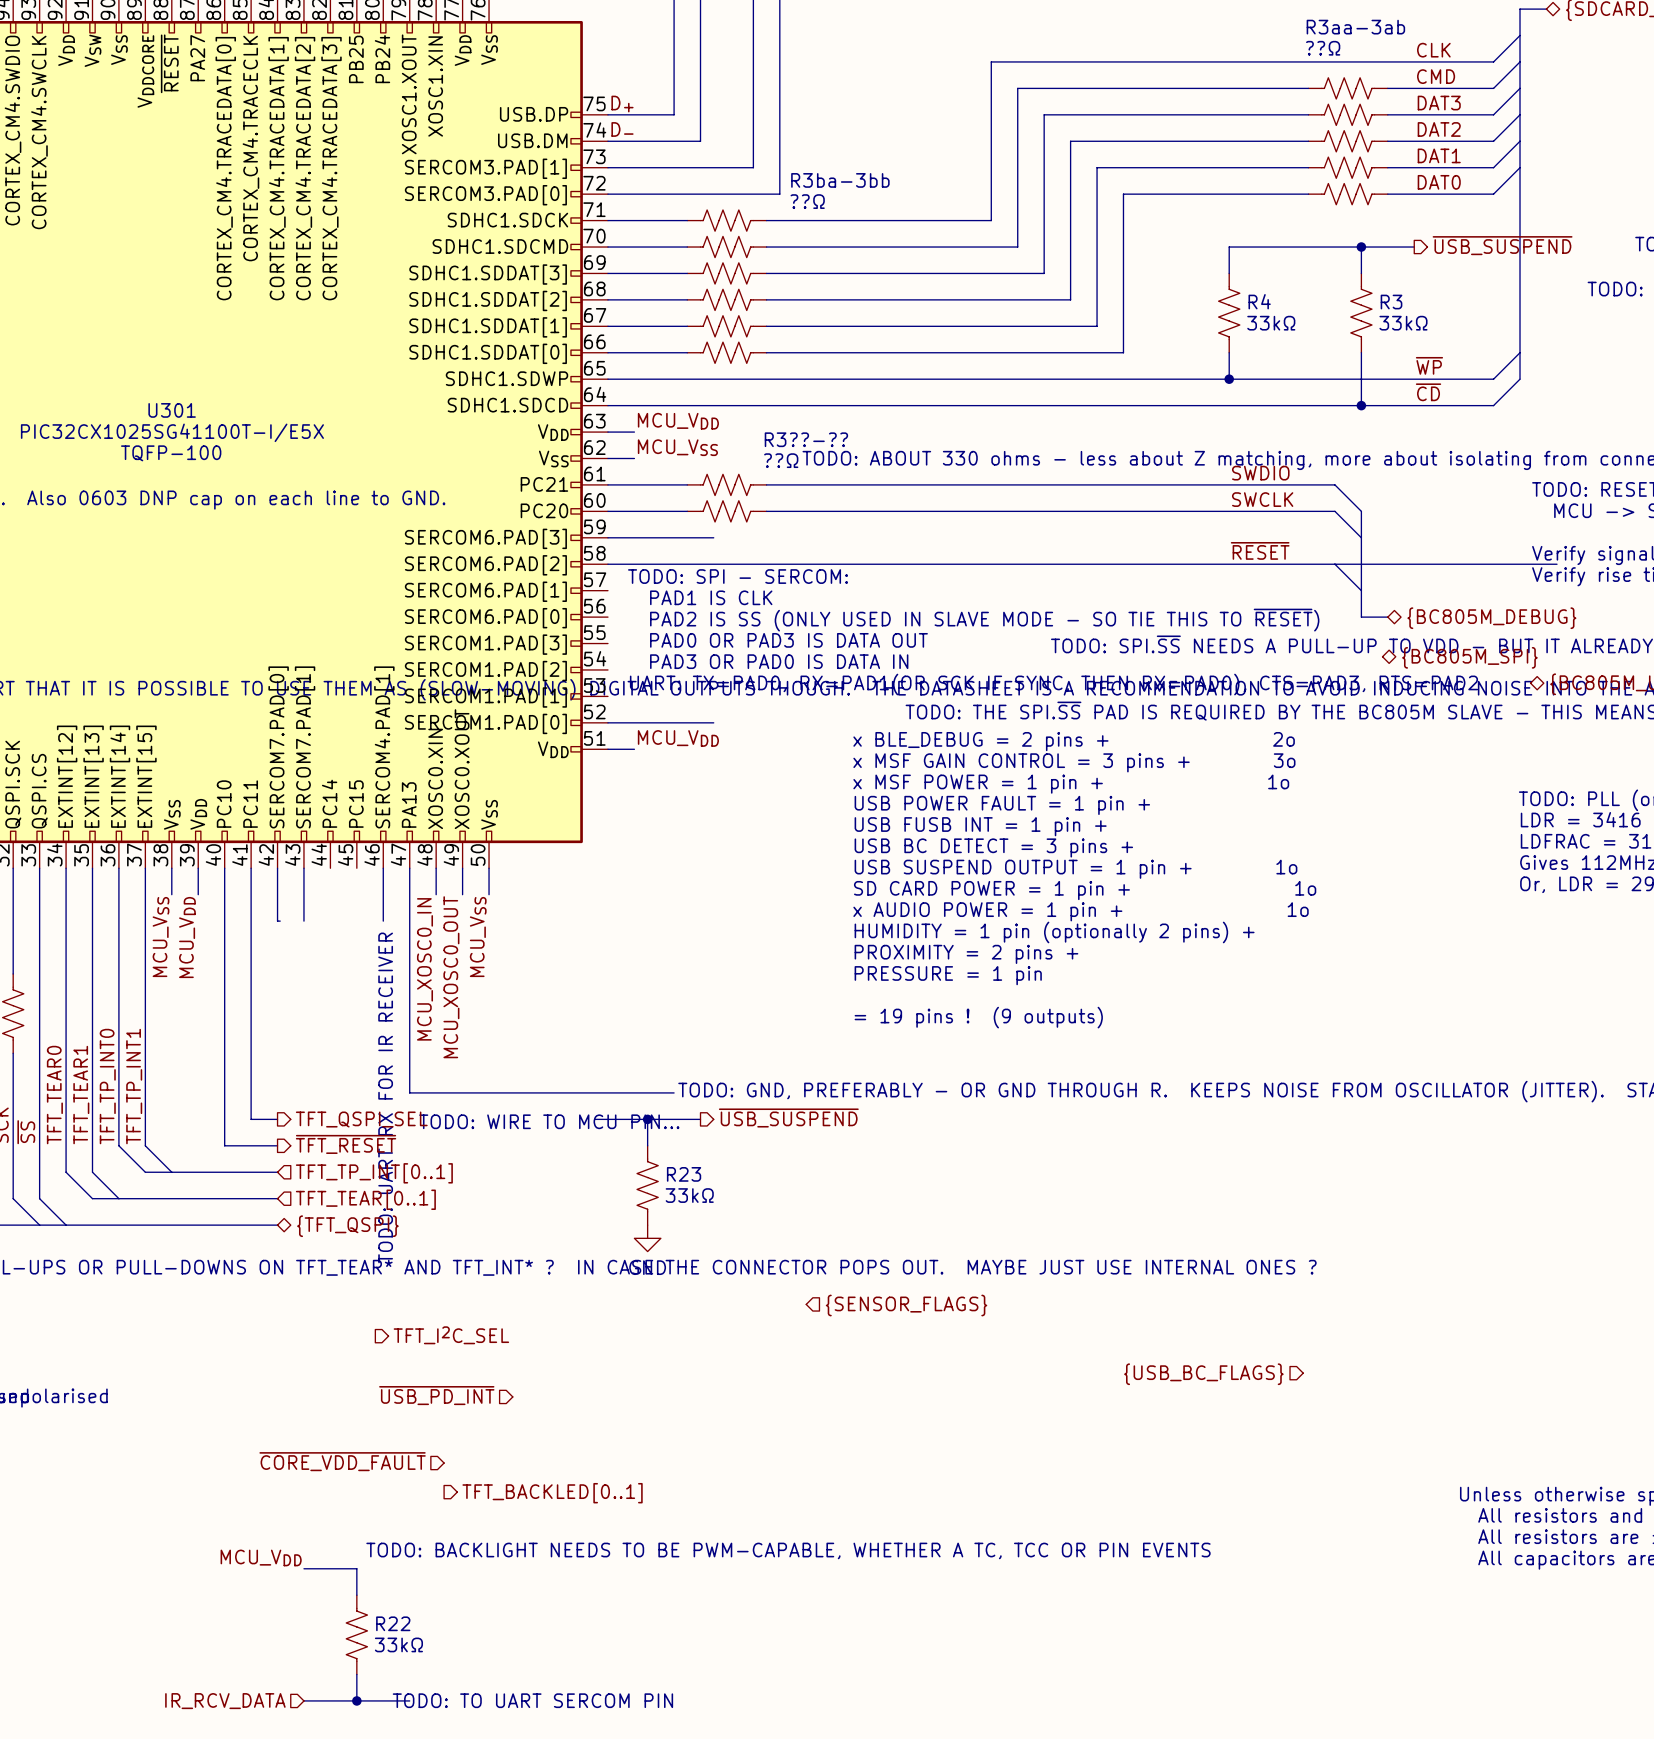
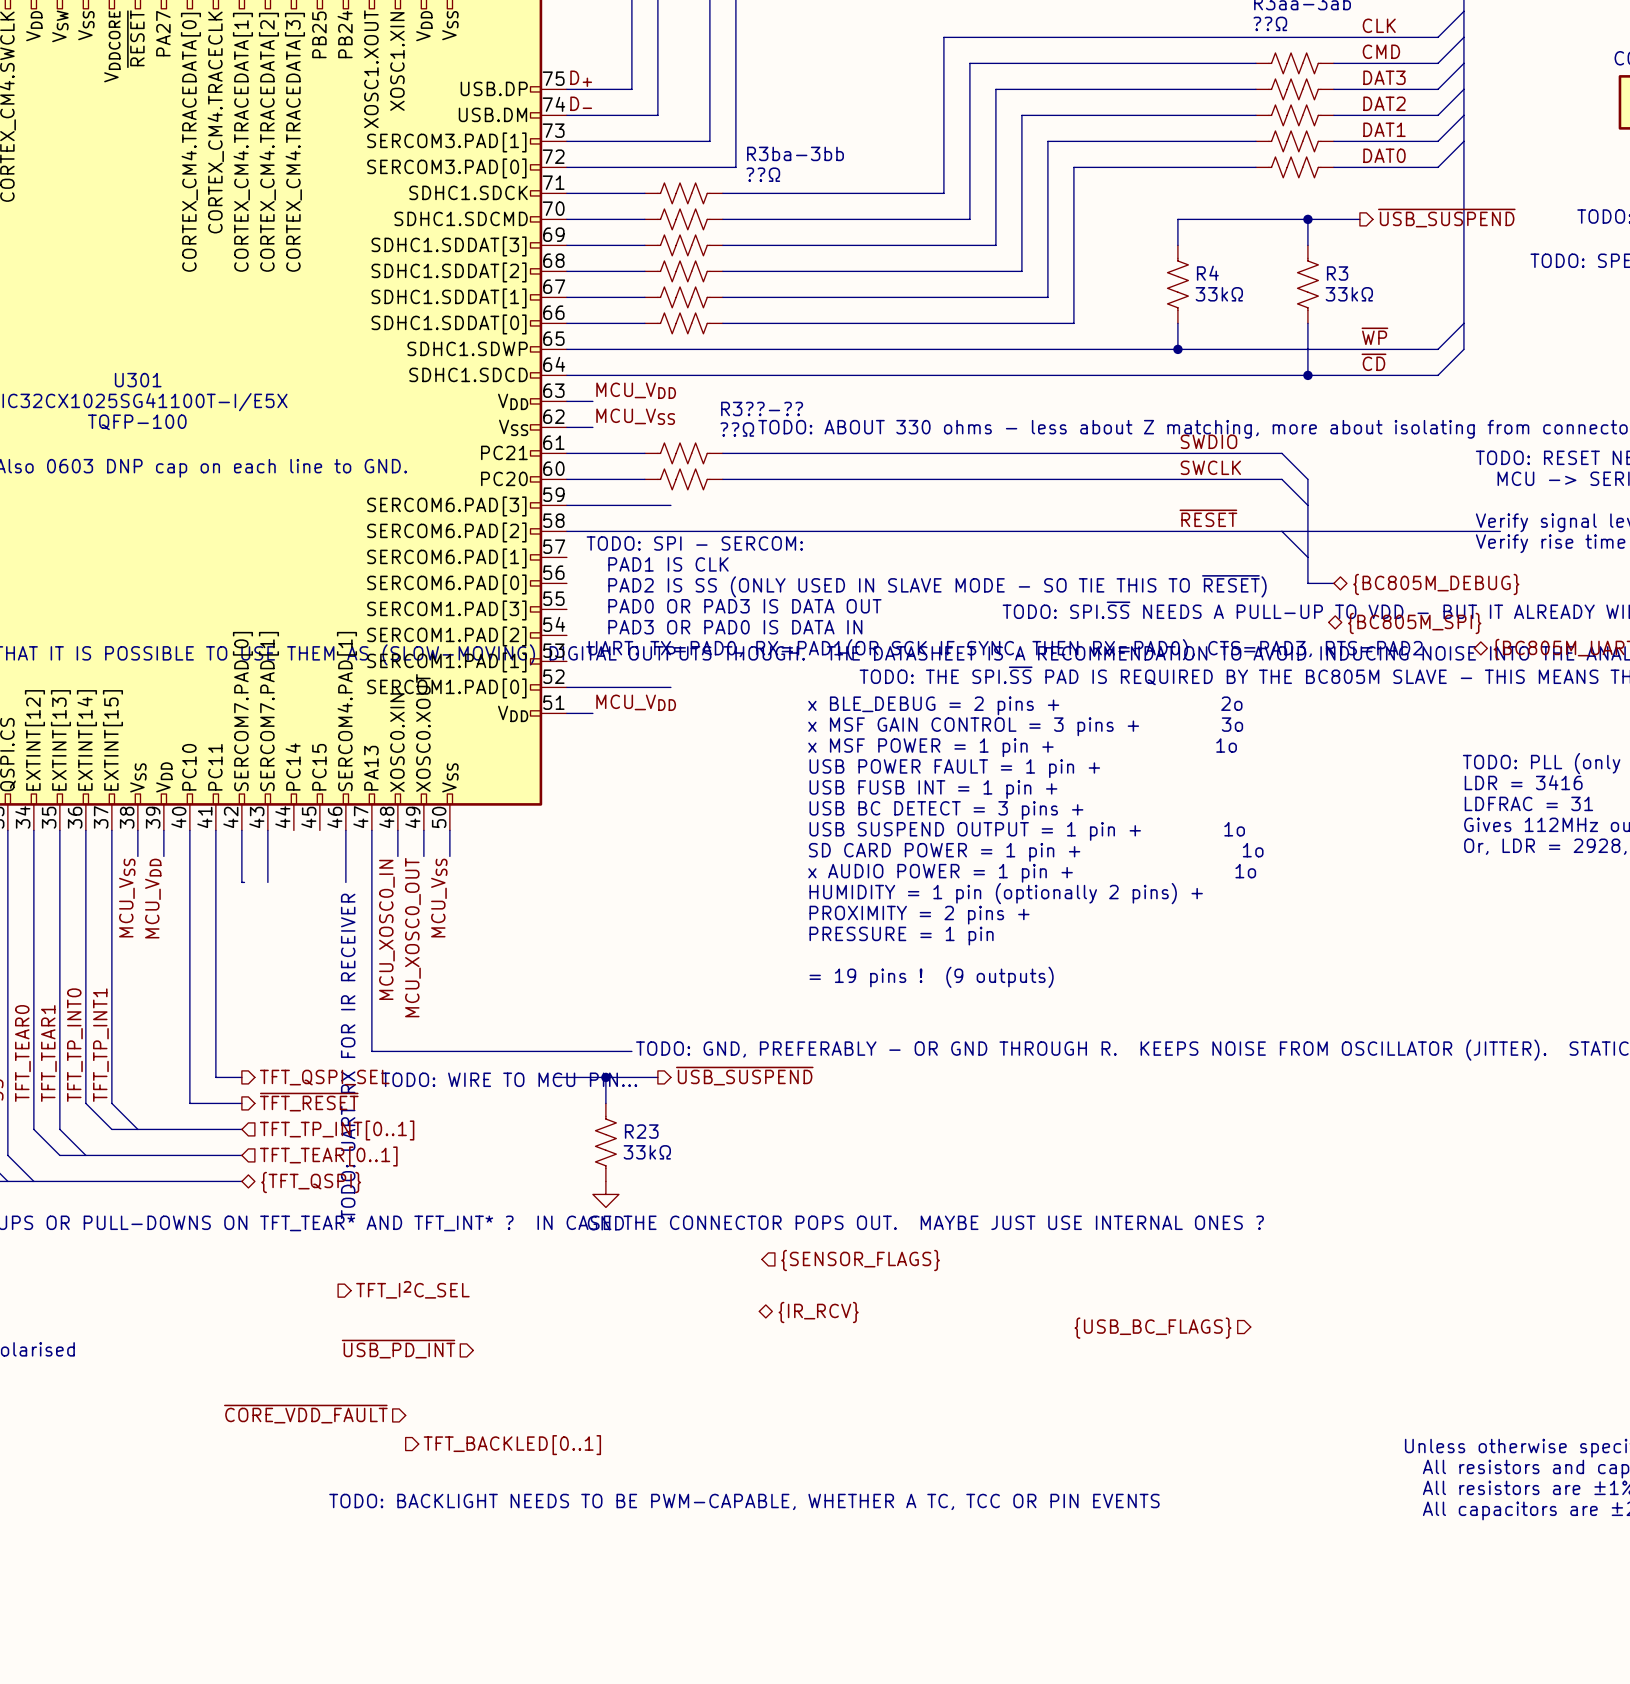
hierarchical label: none -> {IR_RCV} (818, 1312)
label: MCU_VDD (261, 1557) -> none
wire: (303, 1568) (356, 1568) (356, 1595) -> none
R22: 33kΩ (356, 1634) -> none
wire: (356, 1674) (356, 1700) -> none
wire: (303, 1700) (409, 1700) -> none
junction: (356, 1700) -> none
text: TODO: TO UART SERCOM PIN (532, 1700) -> none
hierarchical label: IR_RCV_DATA (225, 1701) -> none

